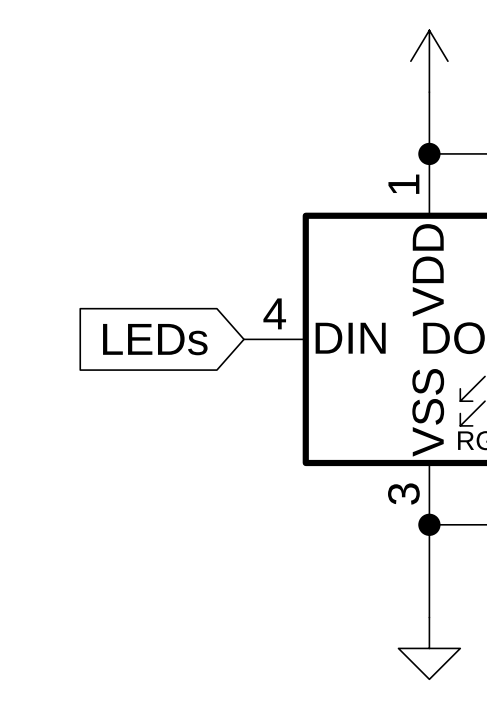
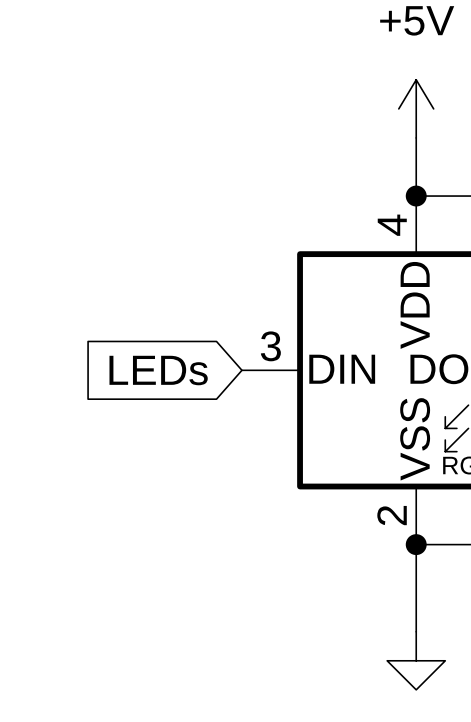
part pin number: 1 (403, 184) -> 4 (392, 225)
part pin number: 4 (274, 313) -> 3 (270, 346)
part pin number: 3 (403, 494) -> 2 (392, 515)

